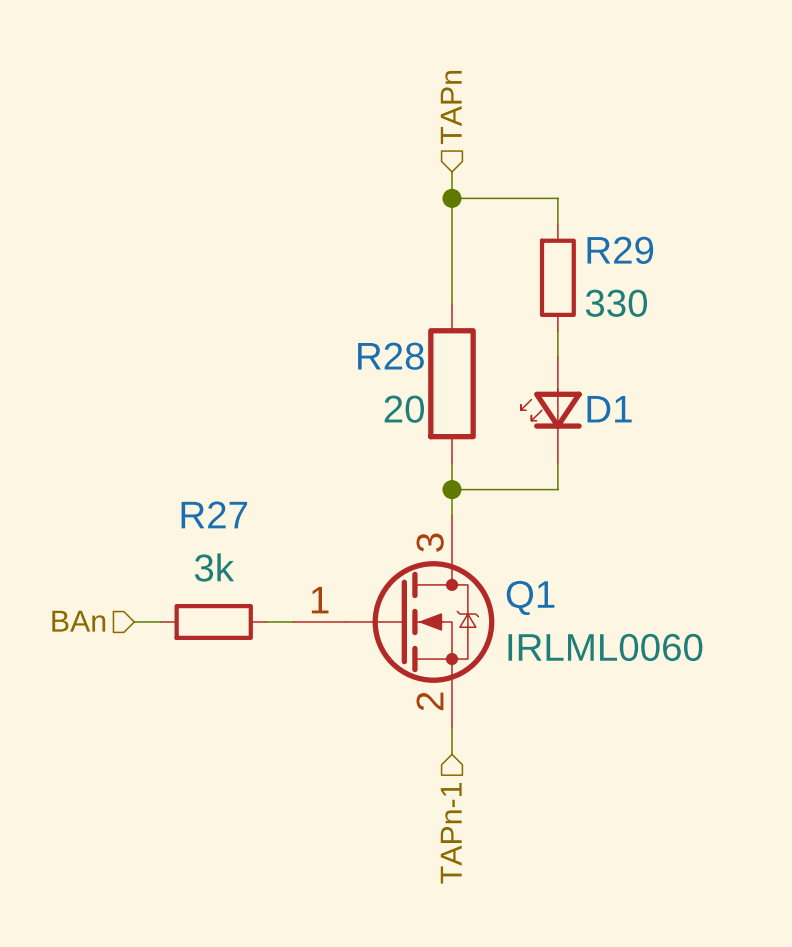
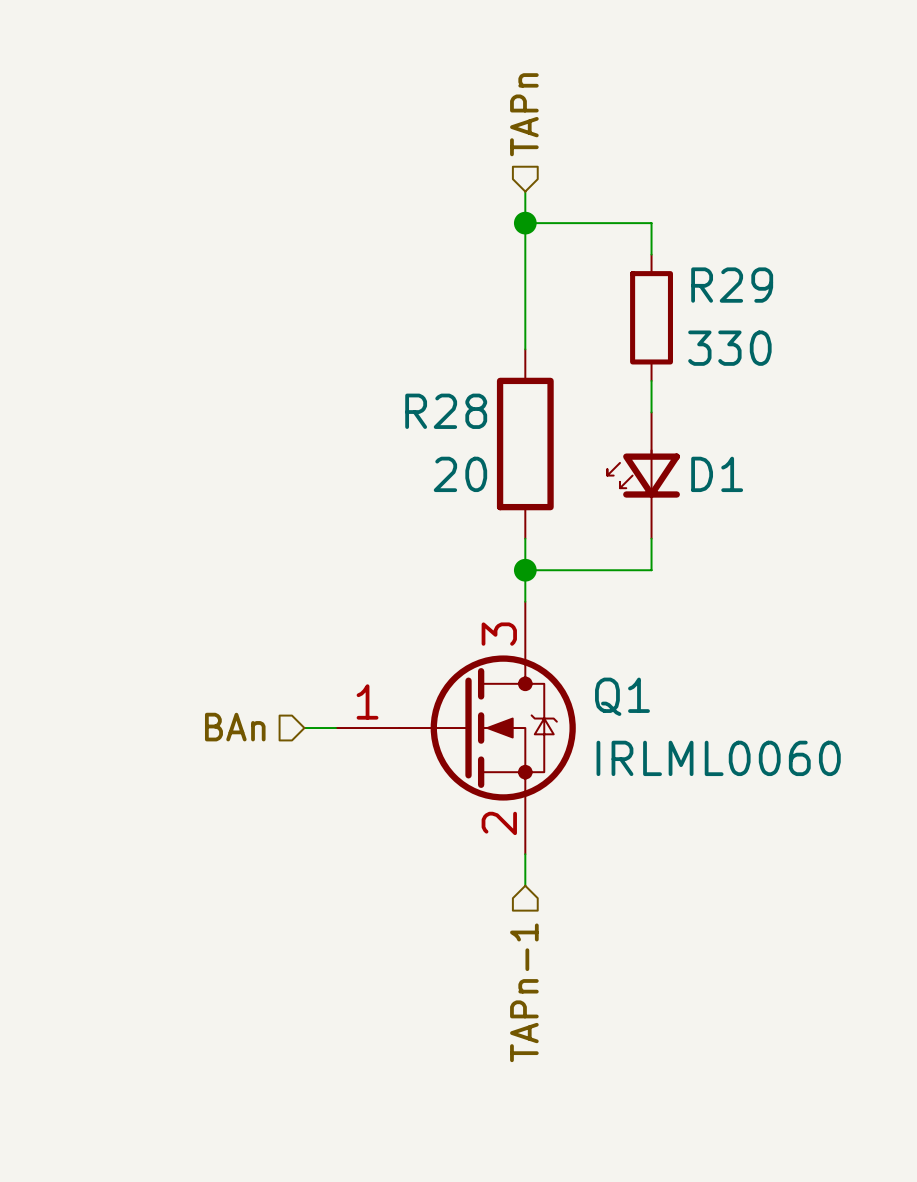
hierarchical label position: BAn (78, 621) -> BAn (235, 727)
wire: (134, 621) (160, 621) -> none
R27: 3k (213, 621) -> none

